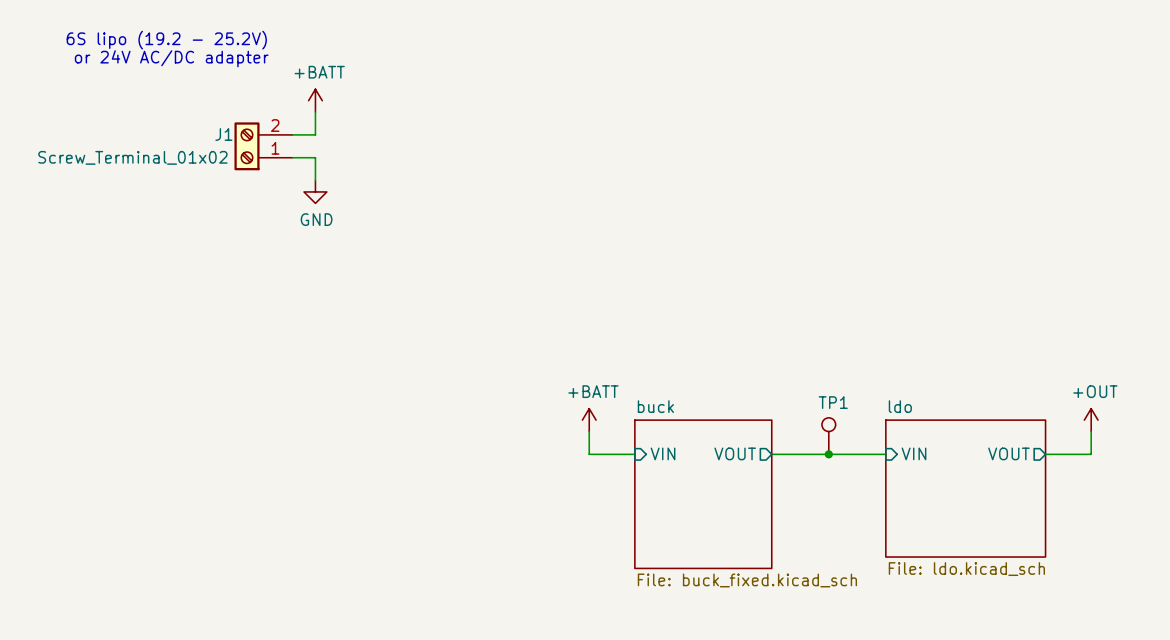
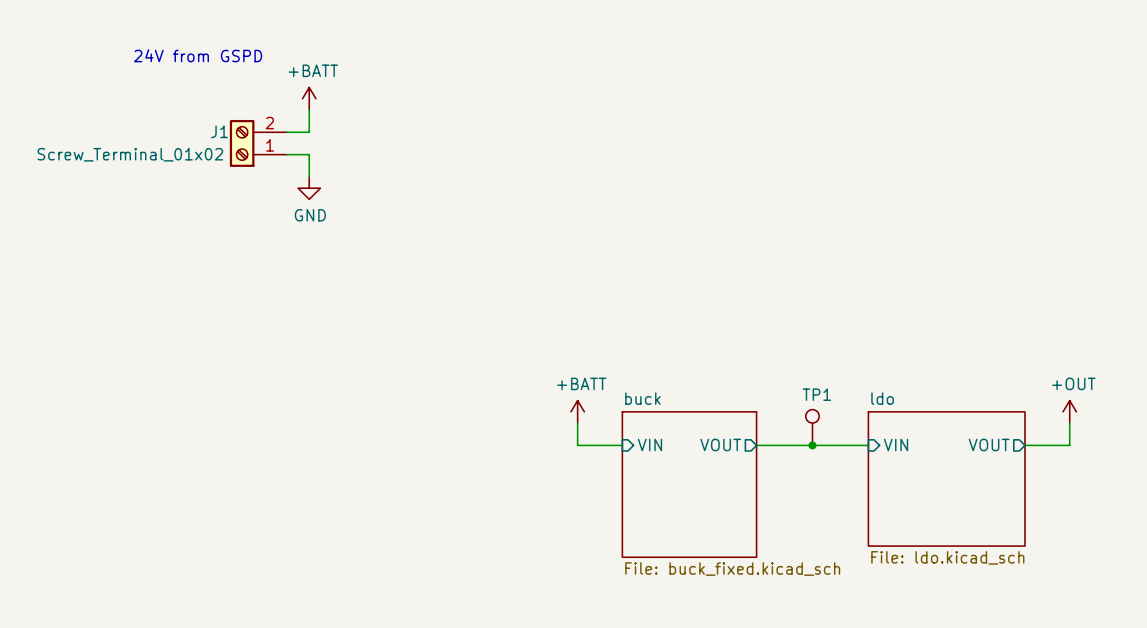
text: 6S lipo (19.2 - 25.2V) (166, 40) -> none
text: or 24V AC/DC adapter (171, 58) -> 24V from GSPD (198, 55)

